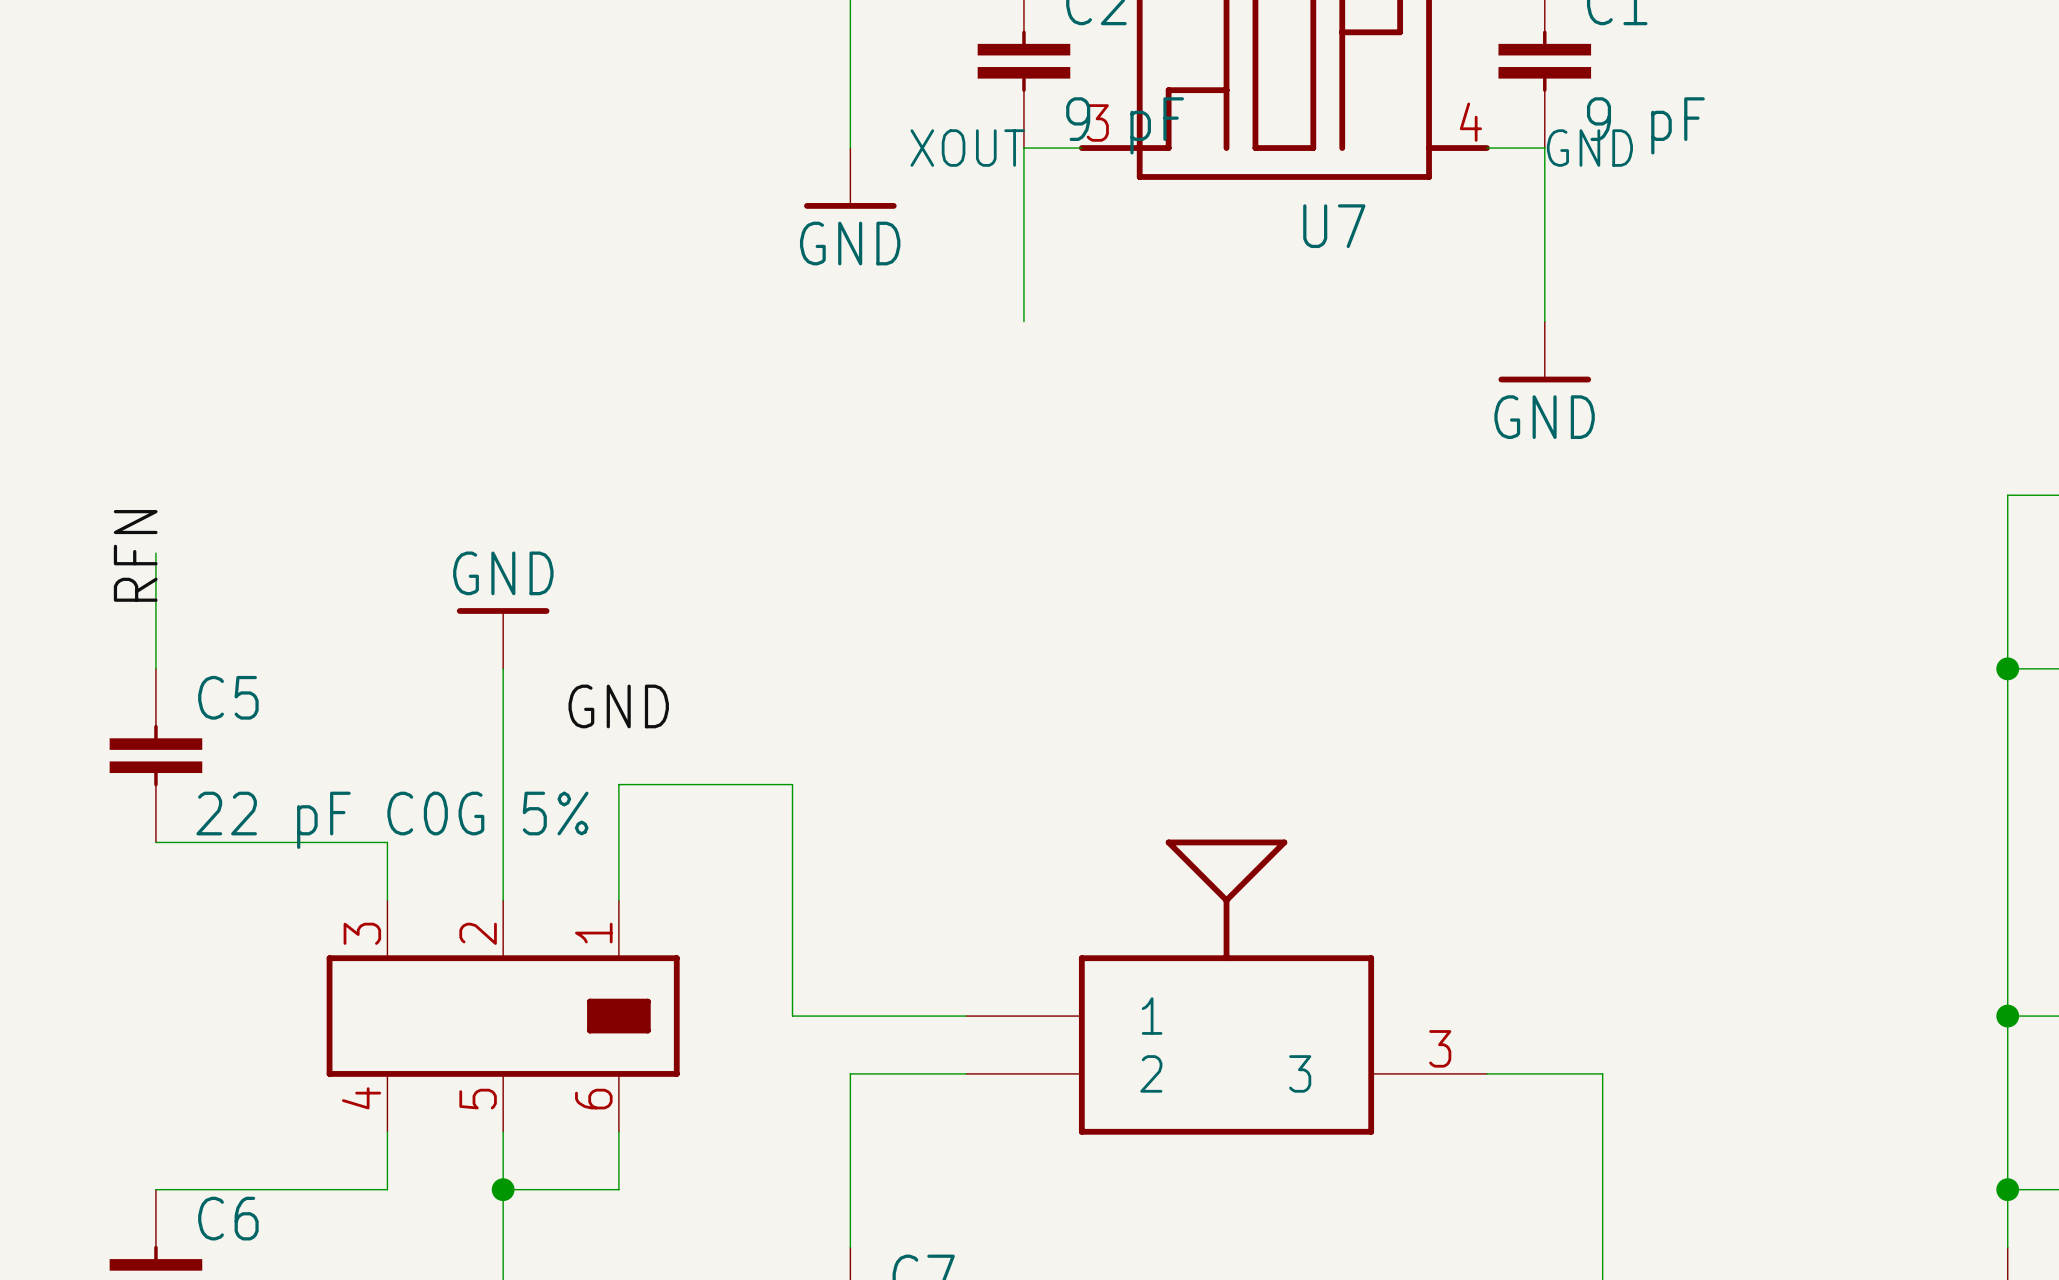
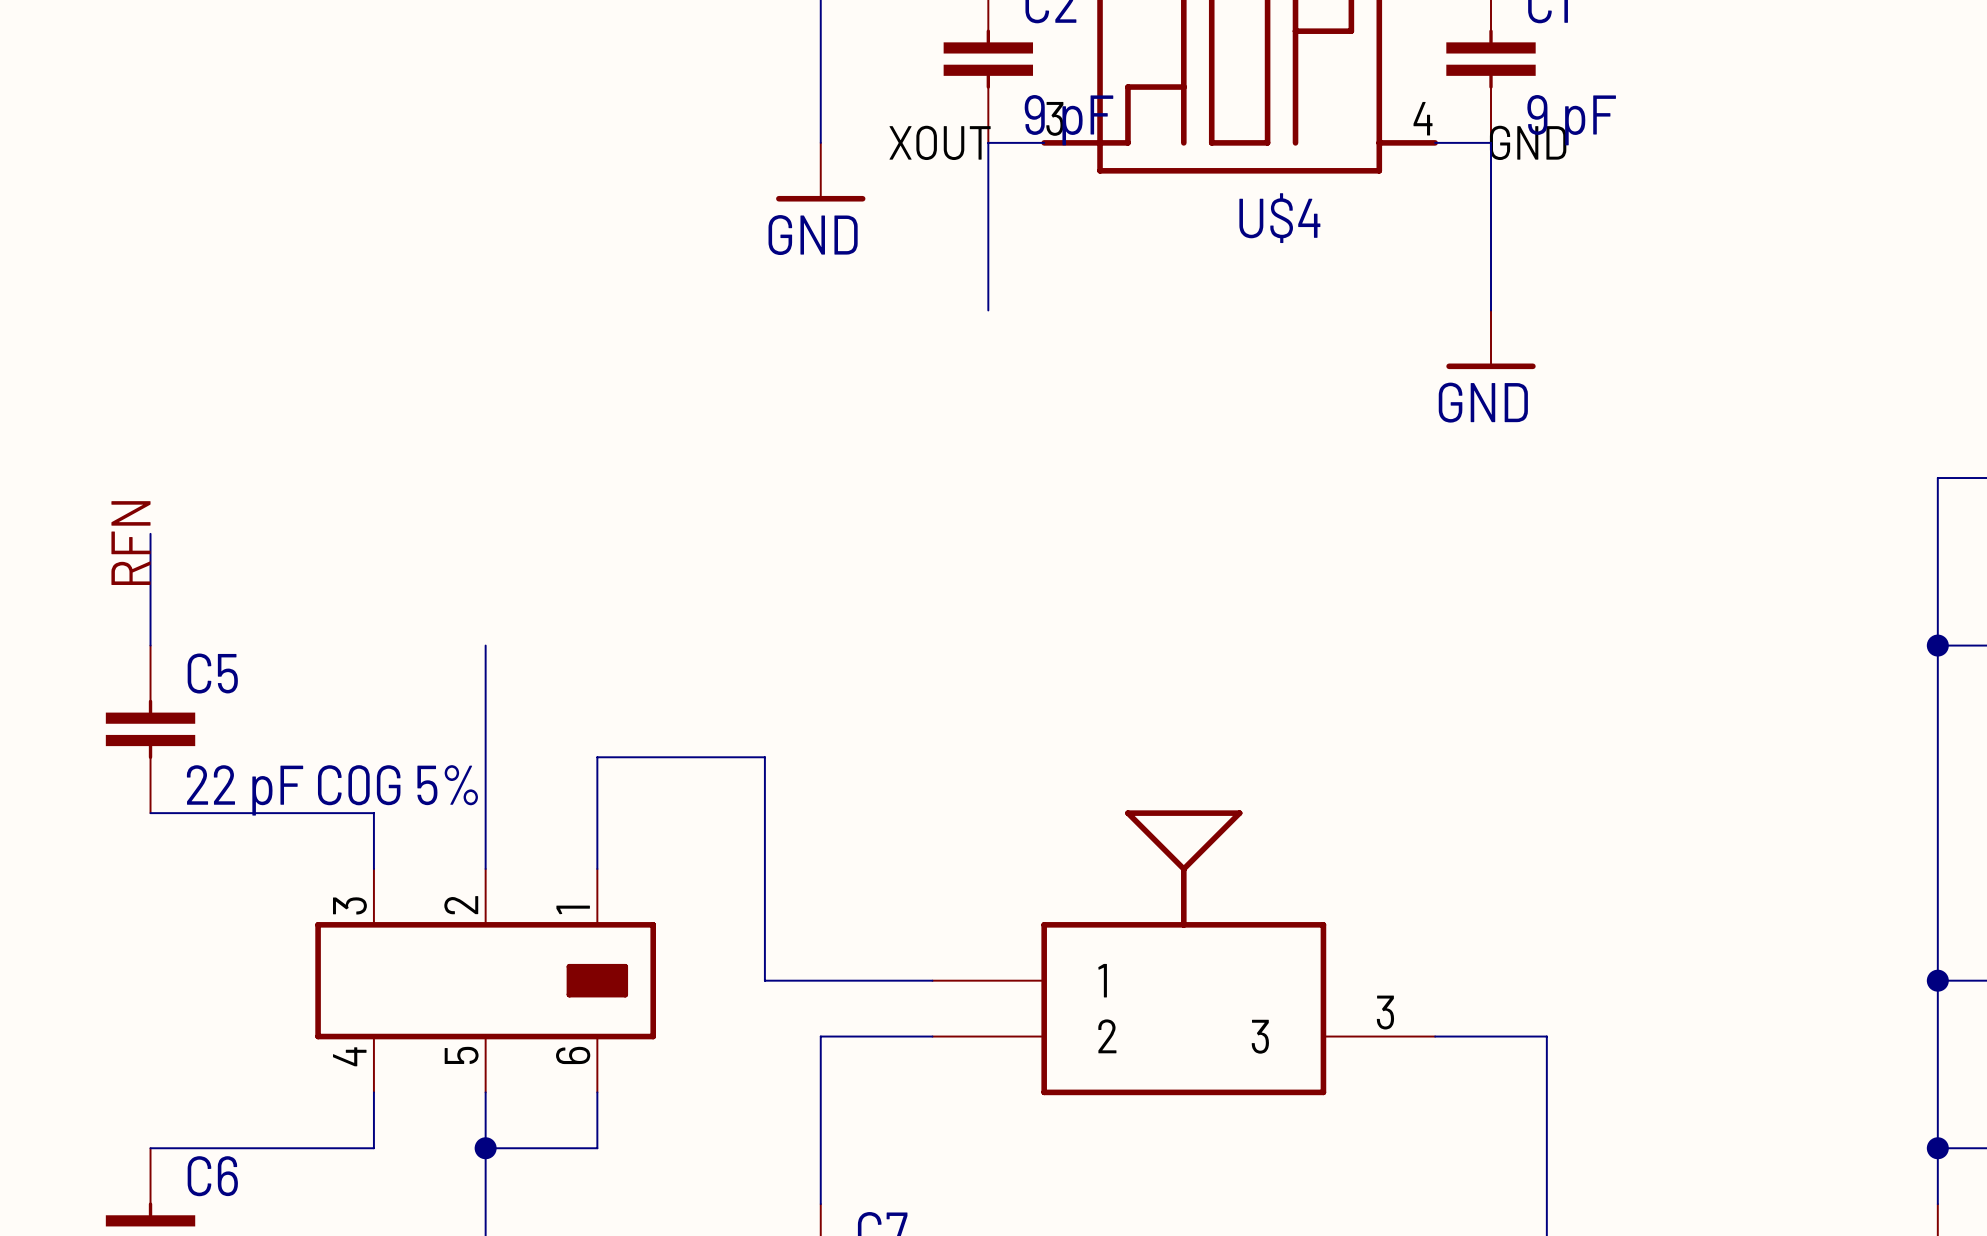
U7 name: U7 (1334, 226) -> U$4 (1279, 218)
power symbol: GND (503, 638) -> none
label: GND (618, 706) -> none

